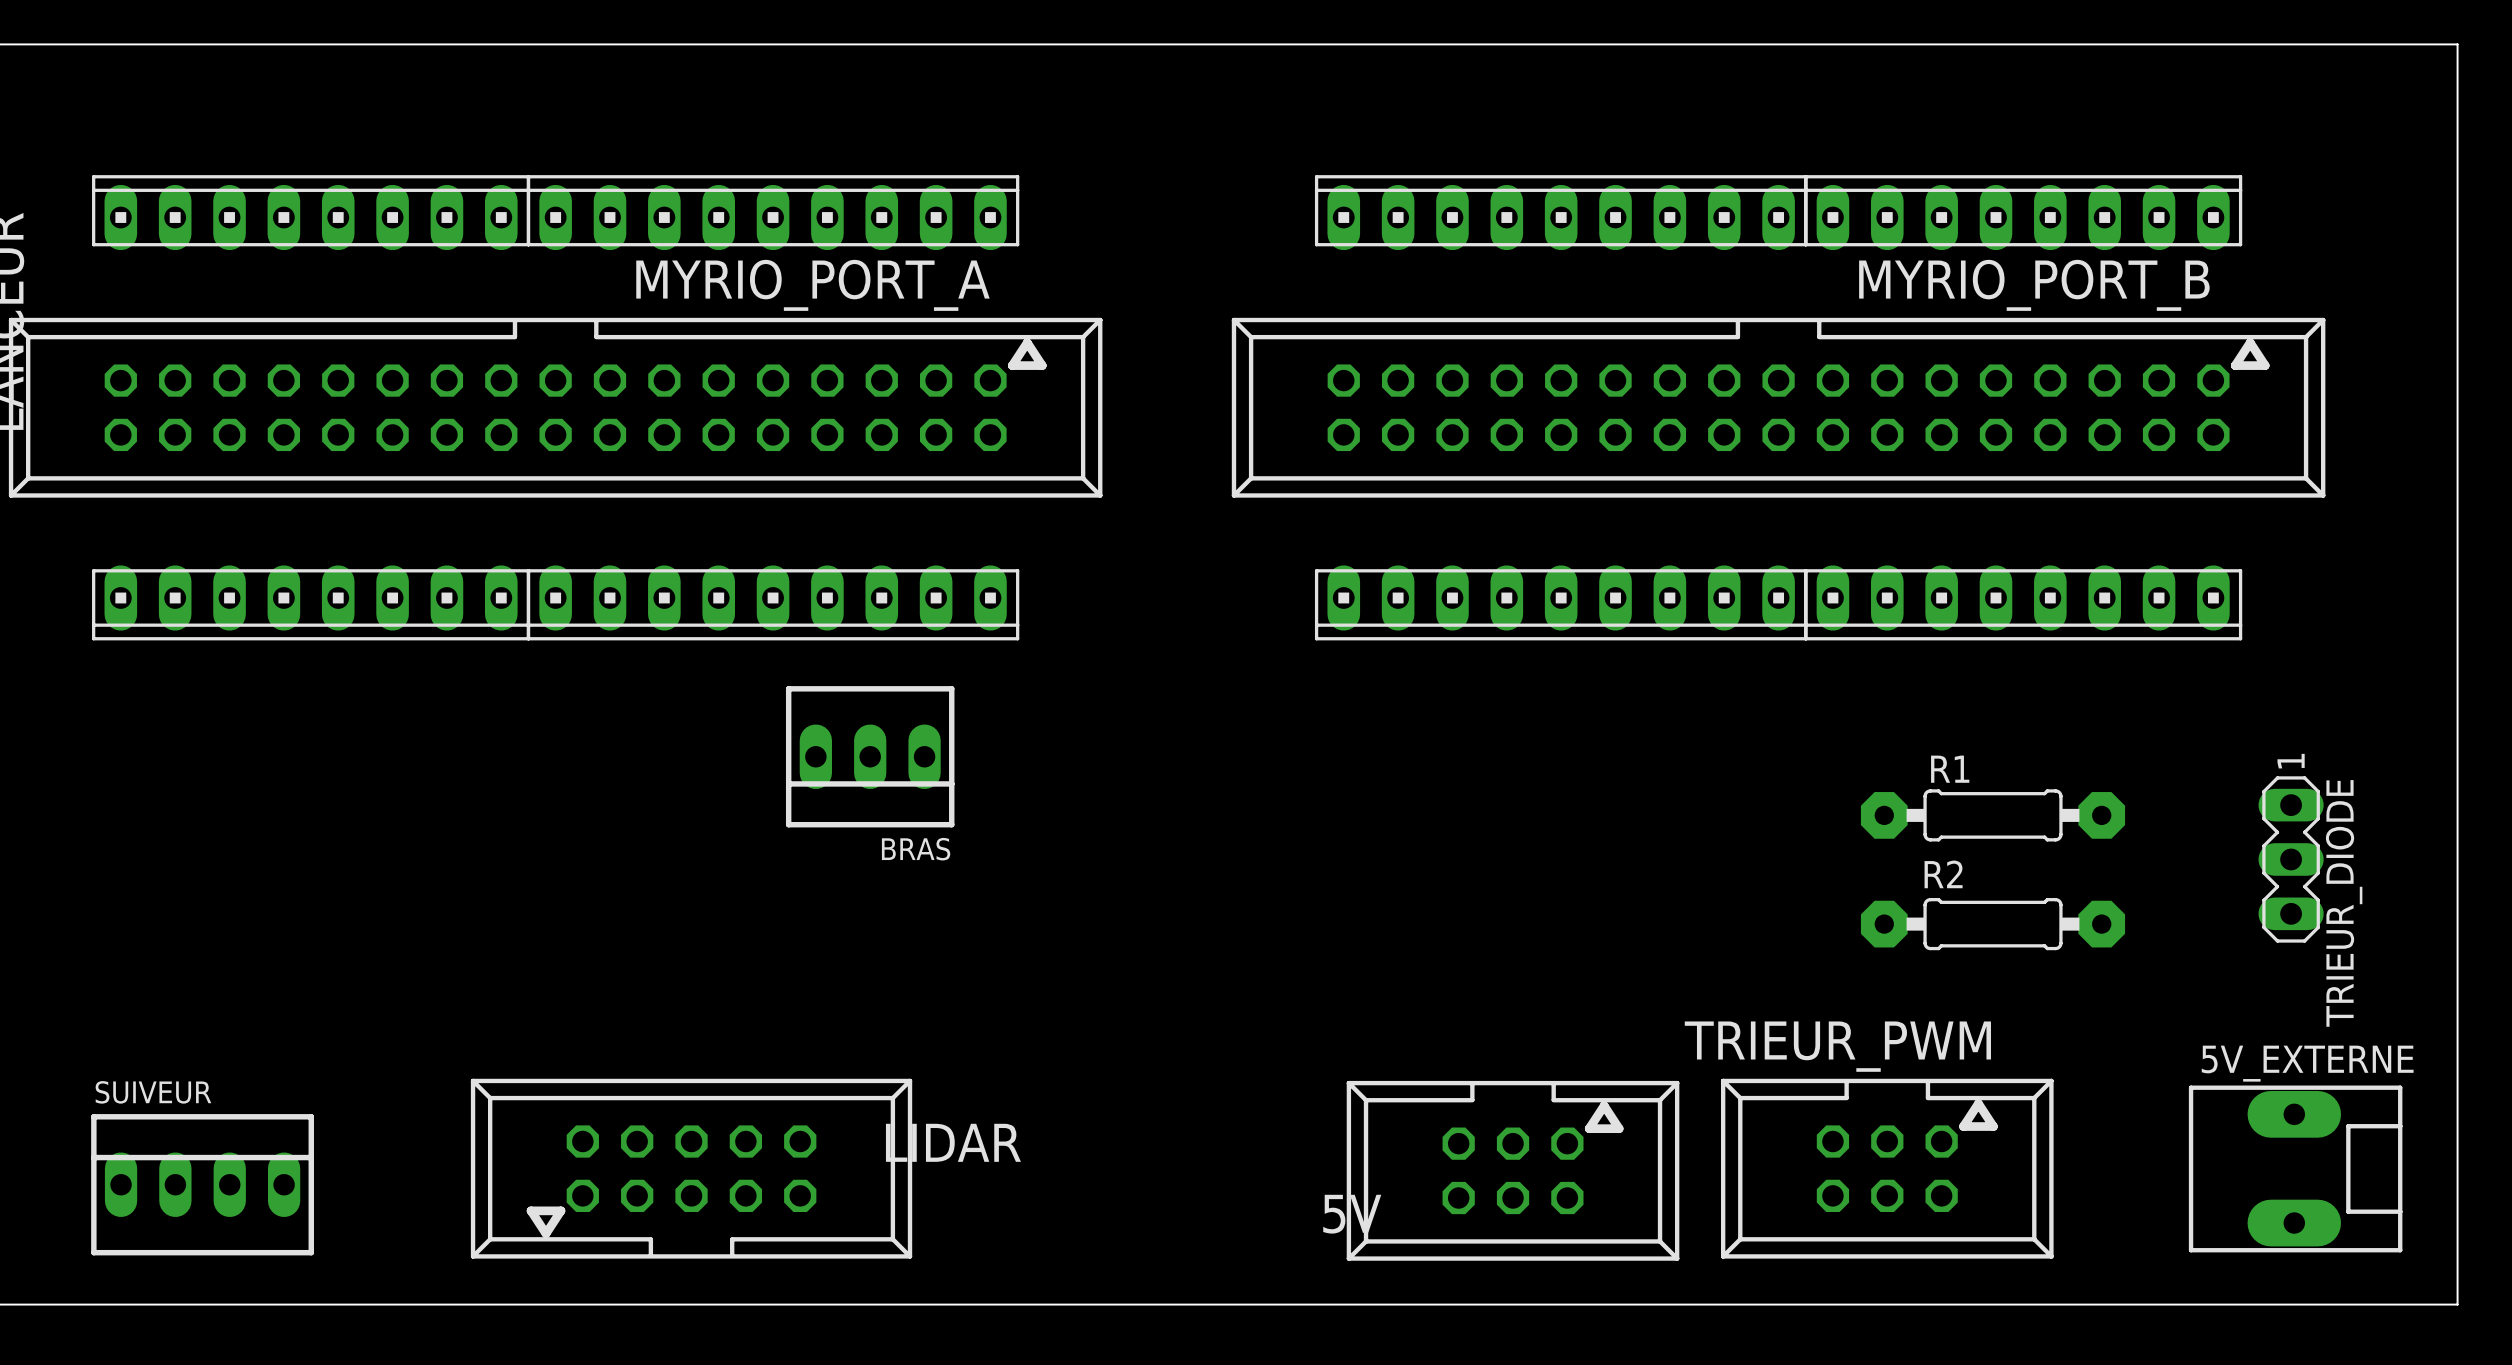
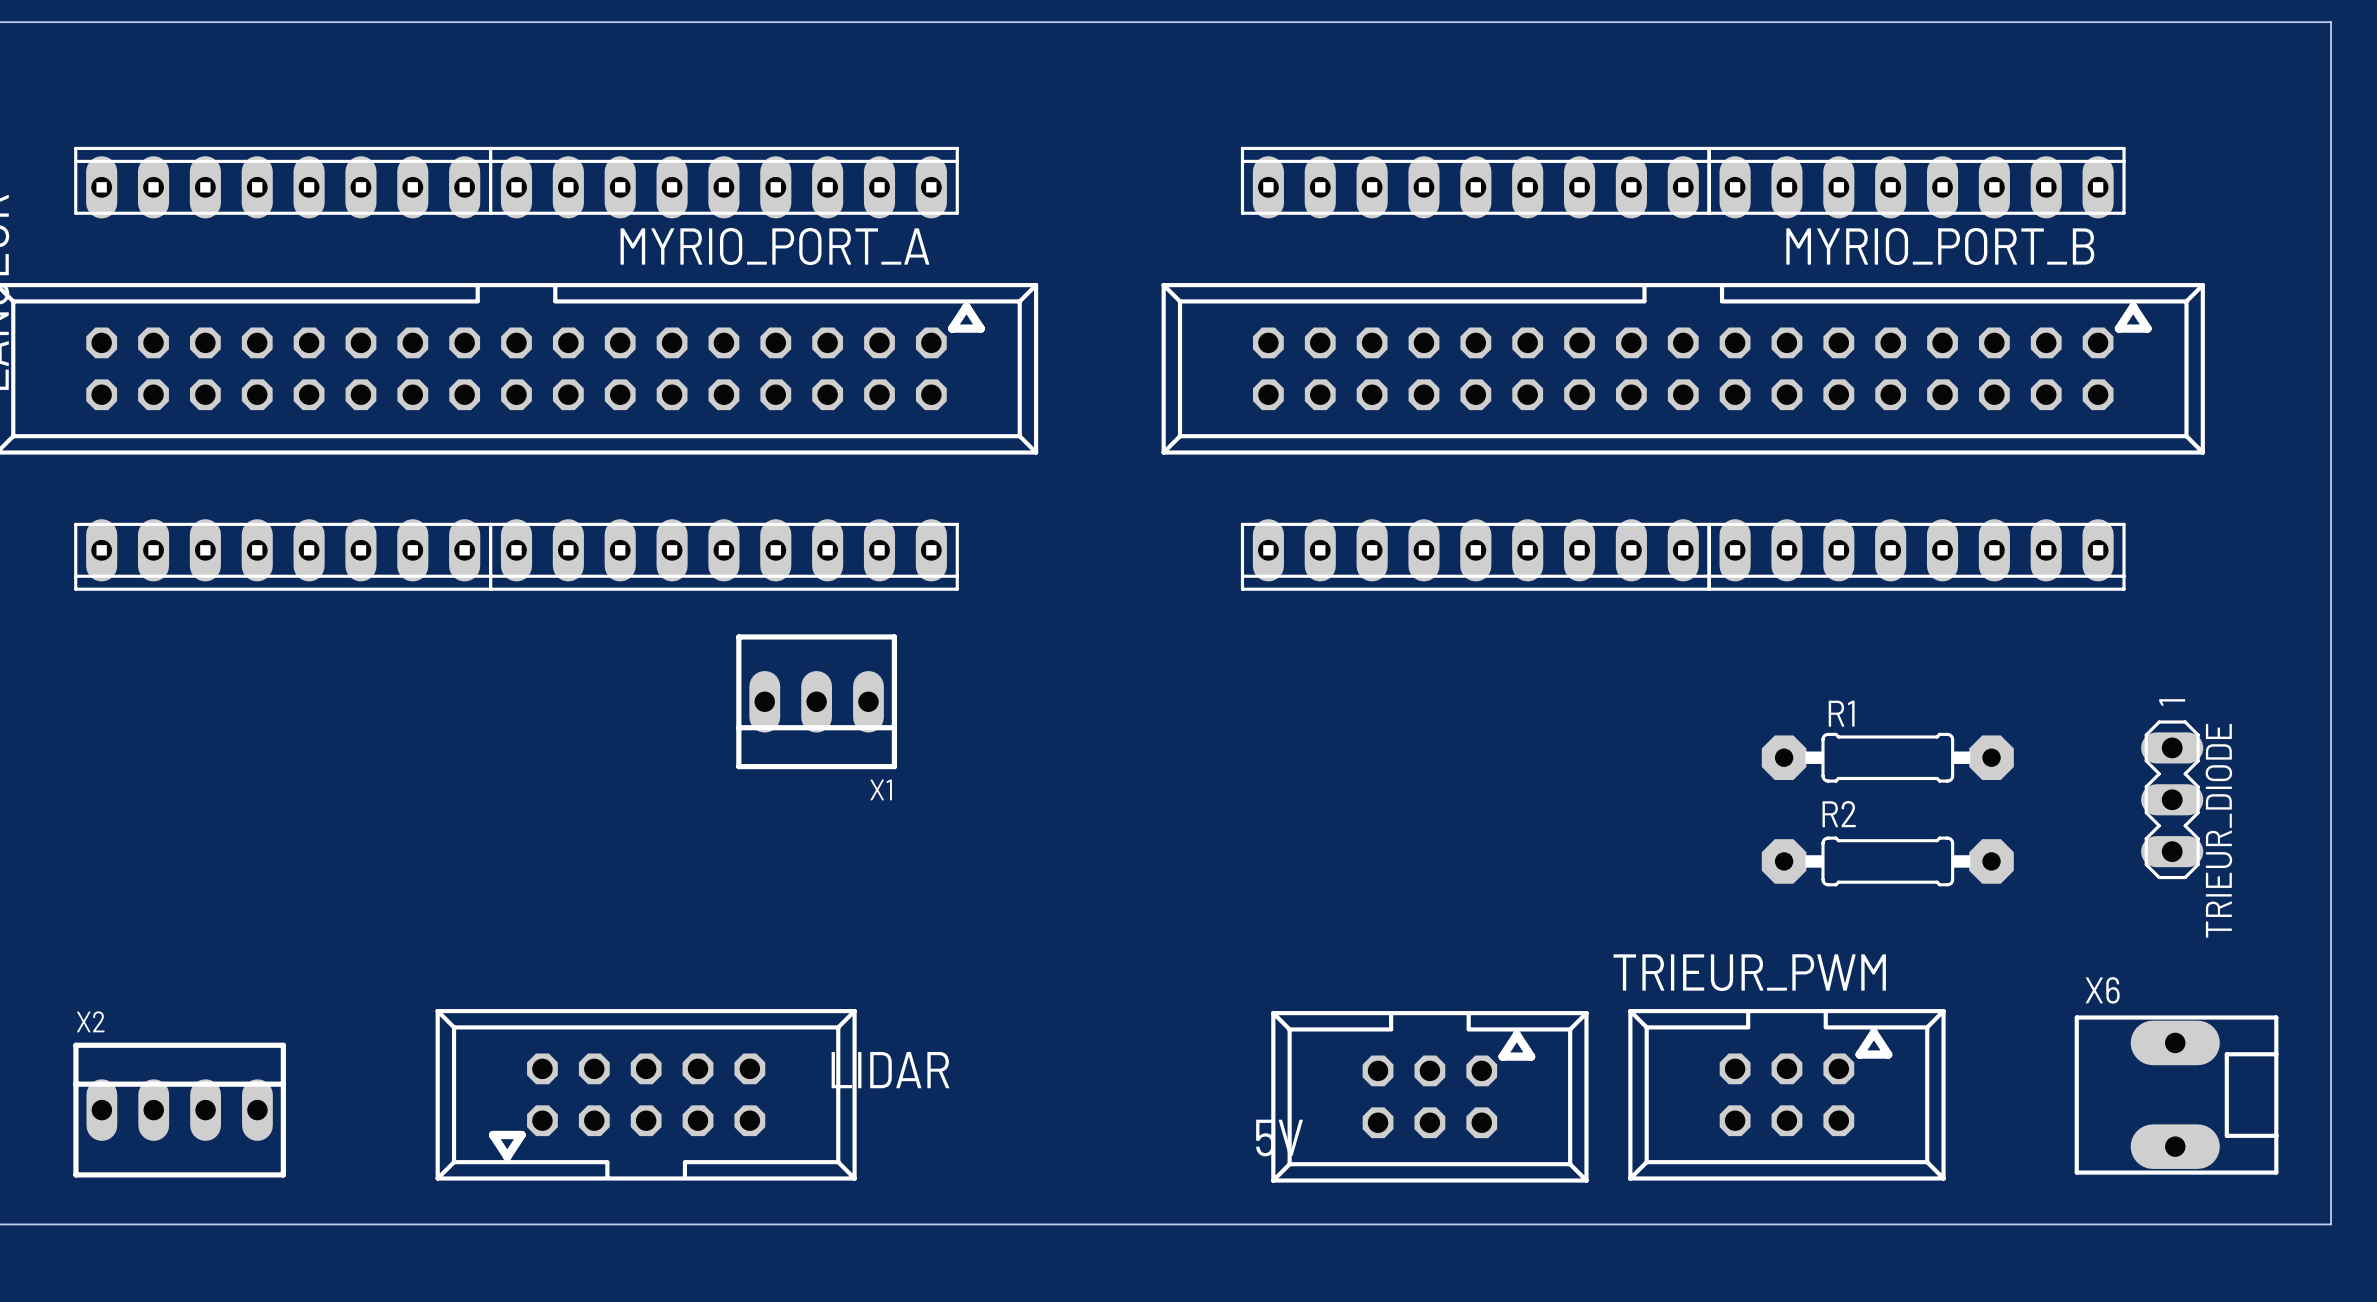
BRAS name: BRAS (916, 849) -> X1 (881, 789)
5V_EXTERNE name: 5V_EXTERNE (2307, 1063) -> X6 (2102, 990)
SUIVEUR name: SUIVEUR (153, 1092) -> X2 (90, 1021)

